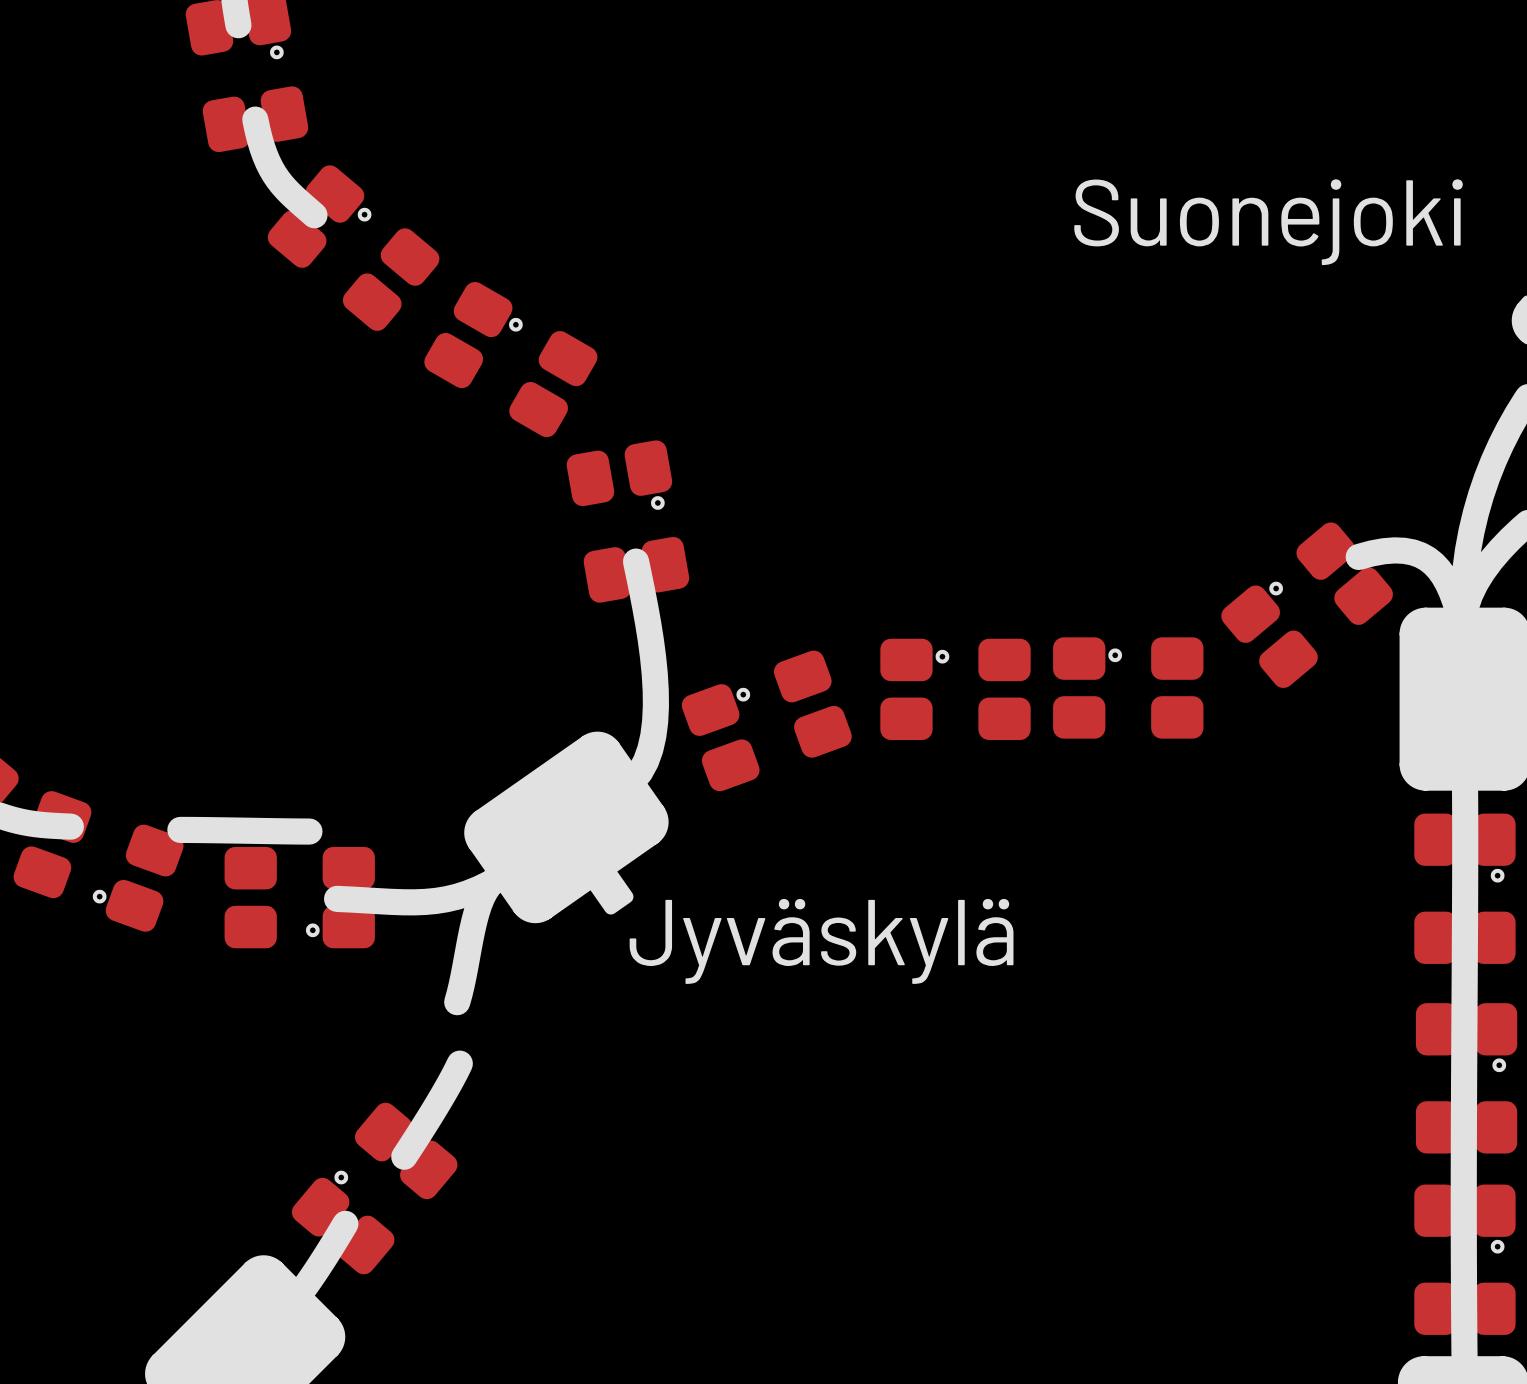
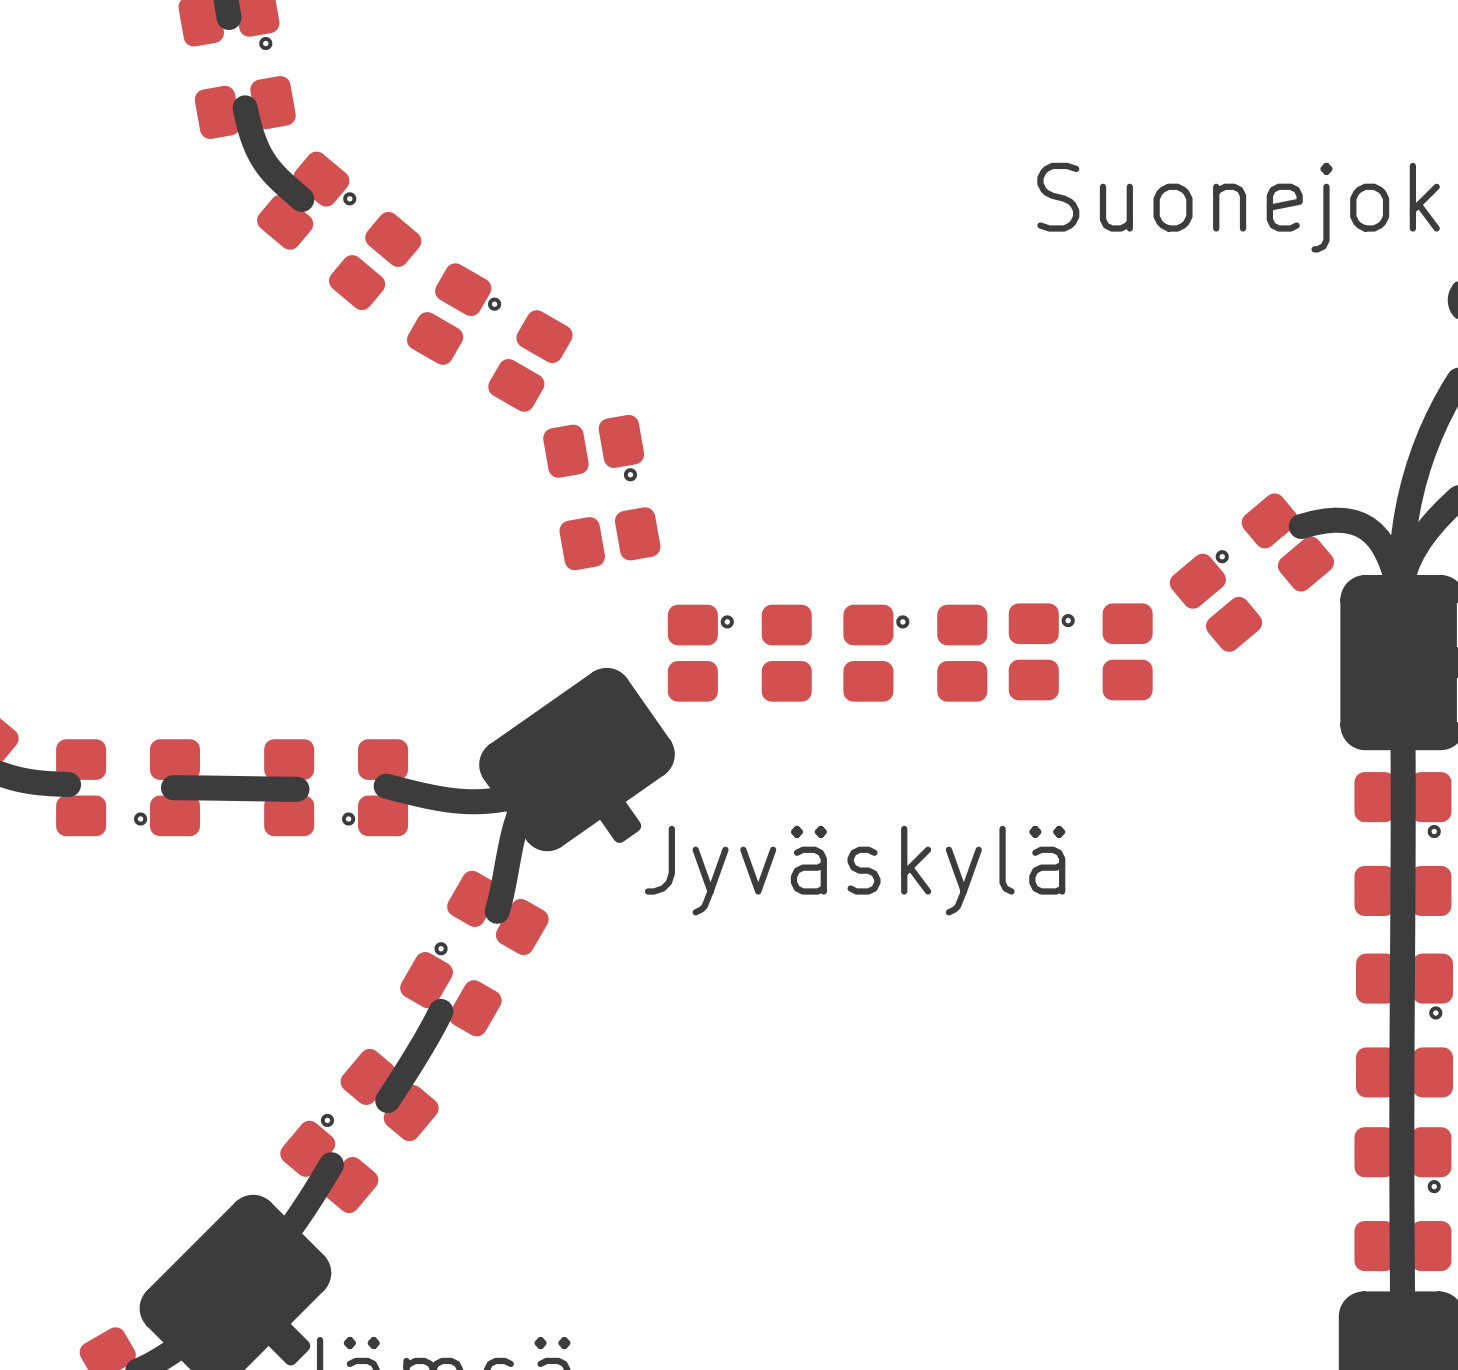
line: (636, 561) (653, 656) (655, 690) (655, 721) (650, 749) (645, 761) (632, 781) (623, 788) -> none
part rotation: 0° (766, 720) -> 20° clockwise (739, 653)
drawing position: (566, 827) -> (577, 759)
line: none -> (386, 786) (431, 797) (465, 801) (498, 800) (536, 792) (527, 799) (518, 817) (497, 911)
line: (529, 858) (490, 883) (467, 893) (446, 899) (414, 902) (337, 898) -> none
part rotation: 0° (98, 861) -> 20° counterclockwise (128, 787)
line: (498, 877) (489, 885) (479, 904) (457, 1002) -> none
part position: (299, 897) -> (336, 787)
part: none -> (474, 953)

